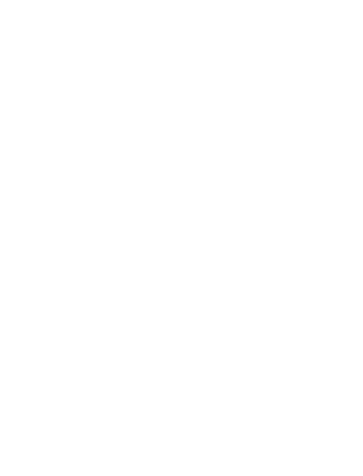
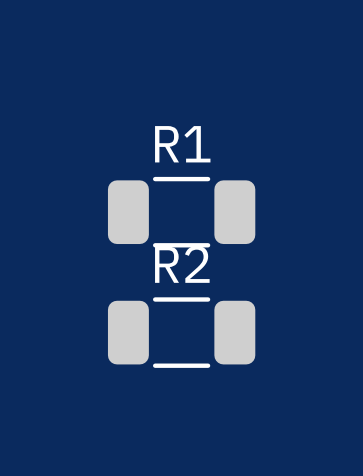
R1: none -> (181, 212)
R2: none -> (181, 332)

